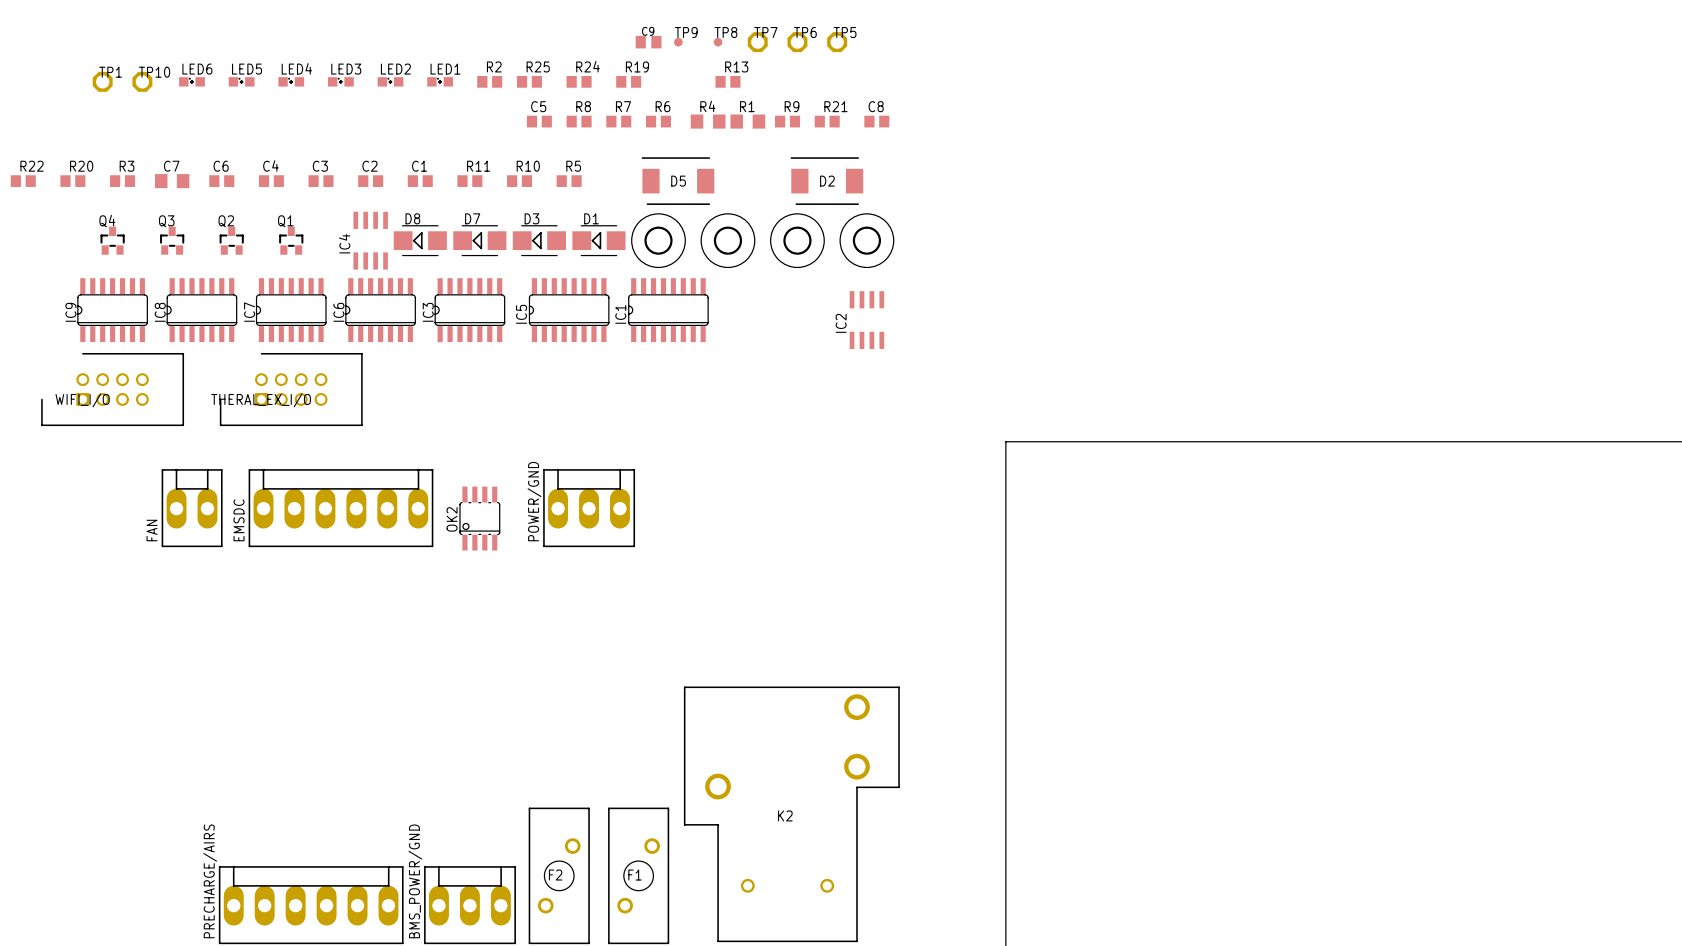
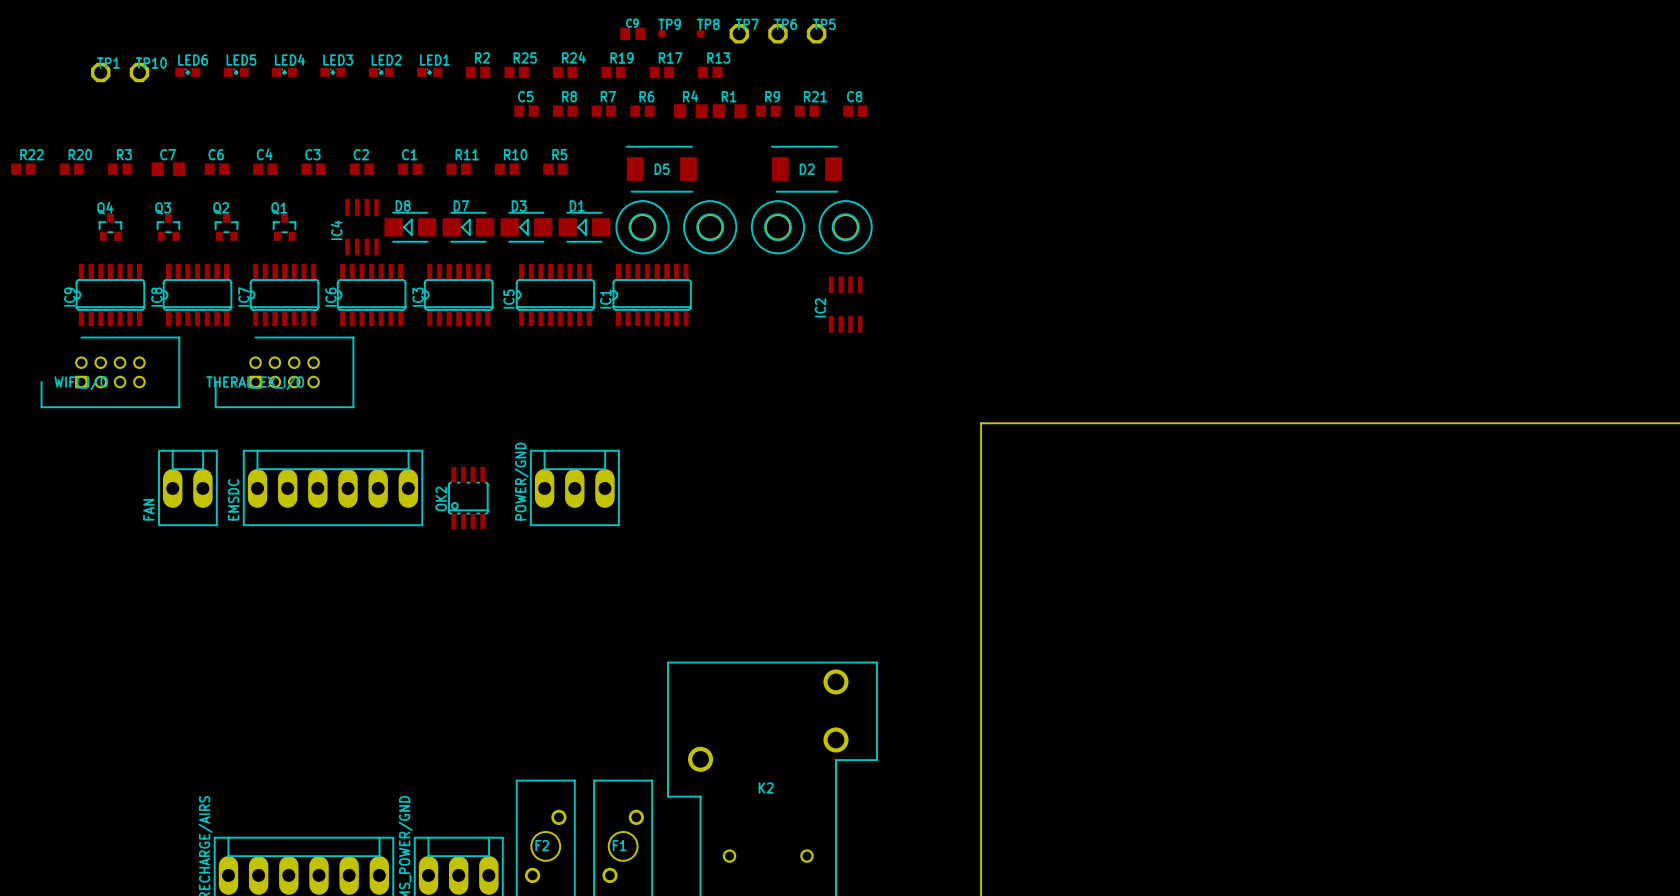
R17: none -> (661, 72)

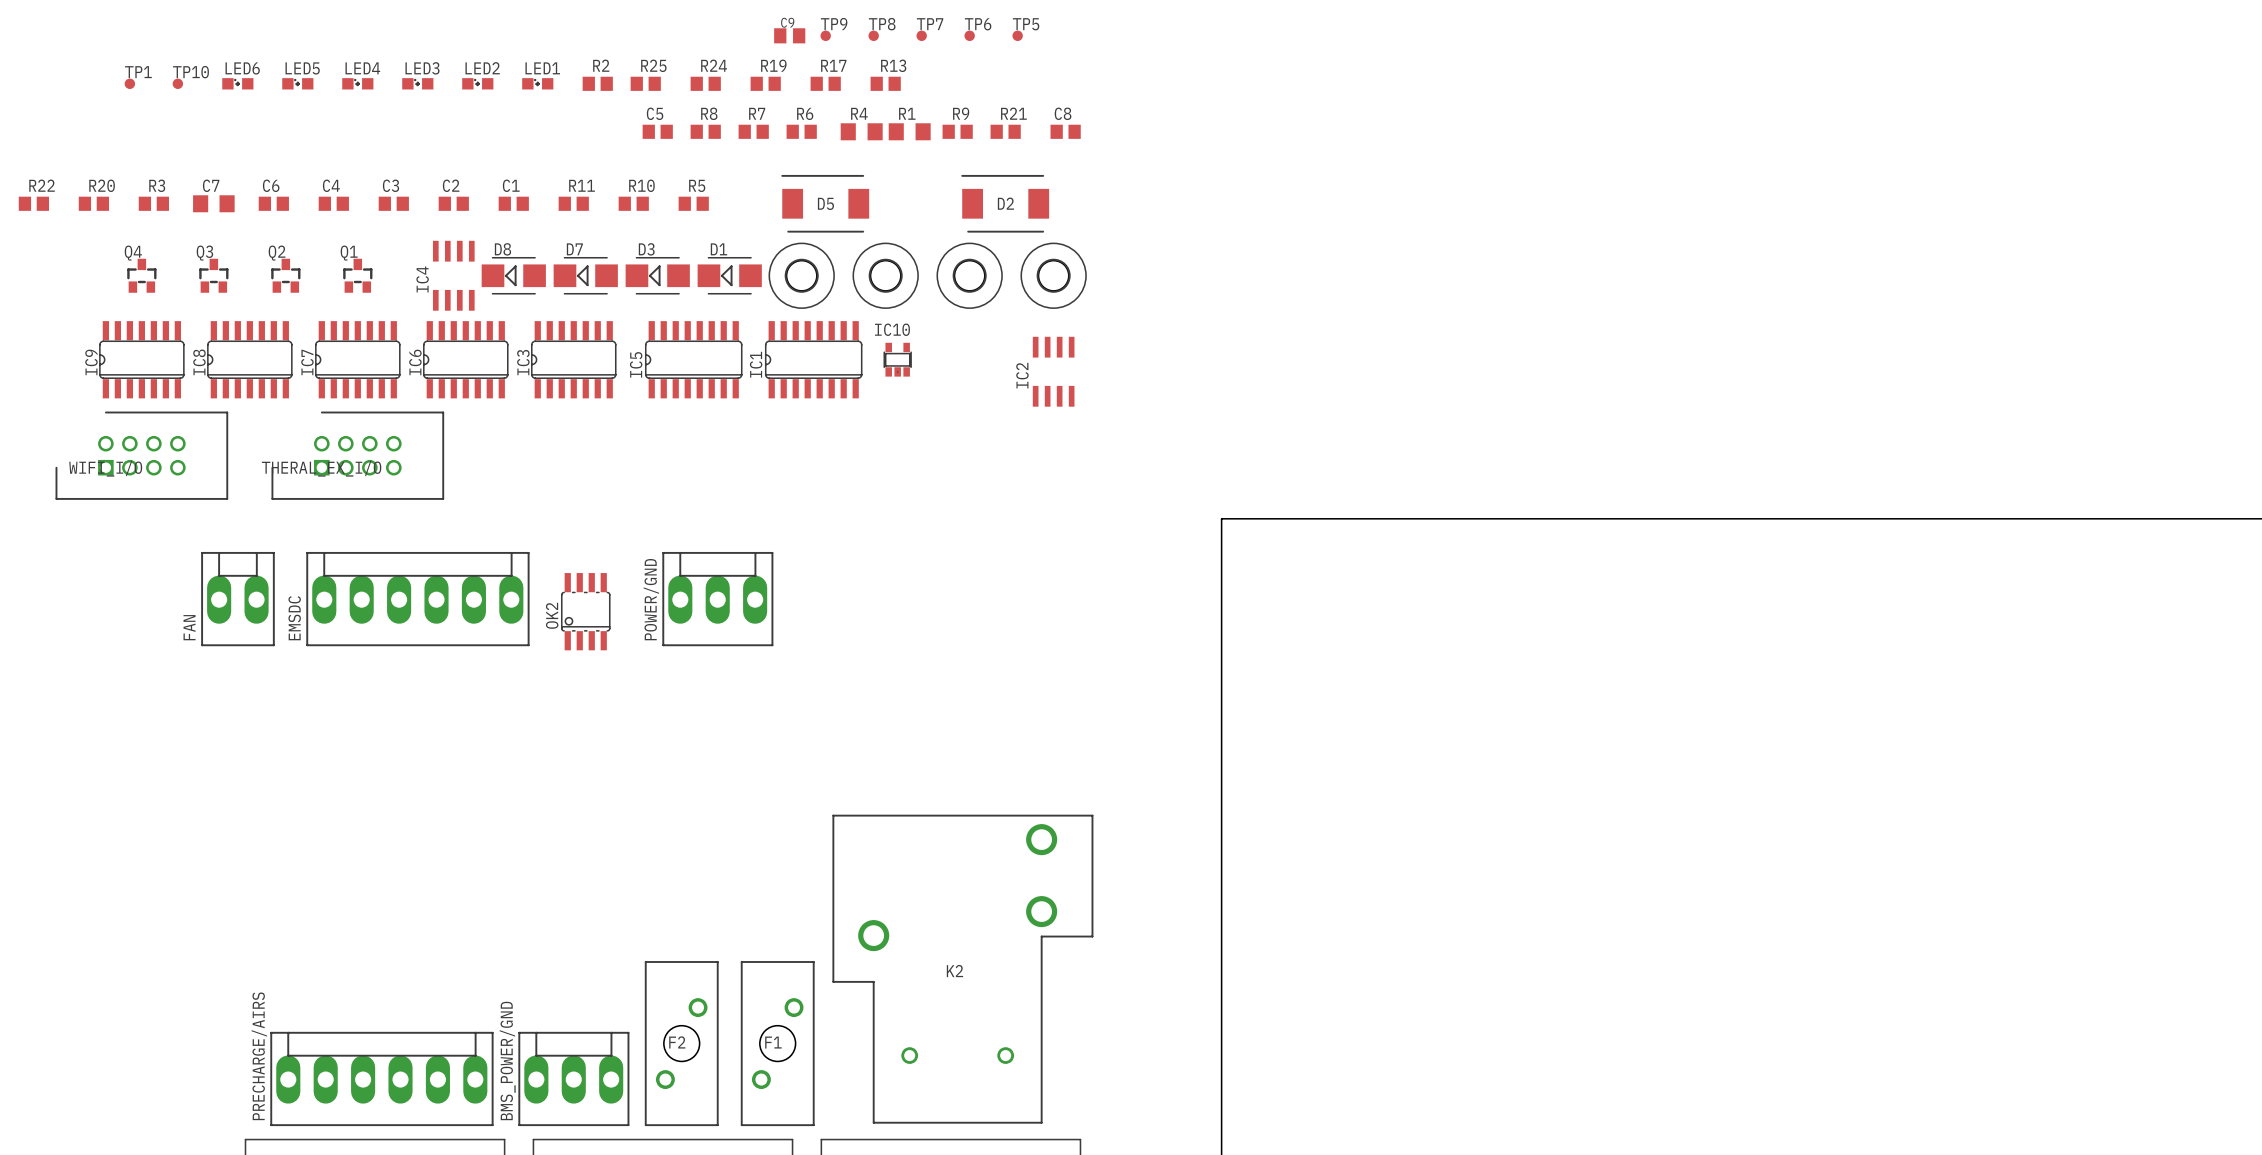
TP7 footprint: [729, 24, 749, 44] -> [916, 30, 927, 42]
TP6 footprint: [768, 24, 788, 44] -> [964, 30, 975, 42]
TP5 footprint: [806, 24, 827, 44] -> [1012, 30, 1023, 42]
TP1 footprint: [91, 62, 111, 83] -> [124, 78, 136, 90]
TP10 footprint: [129, 62, 150, 83] -> [172, 78, 184, 90]
IC10: none -> (897, 359)

